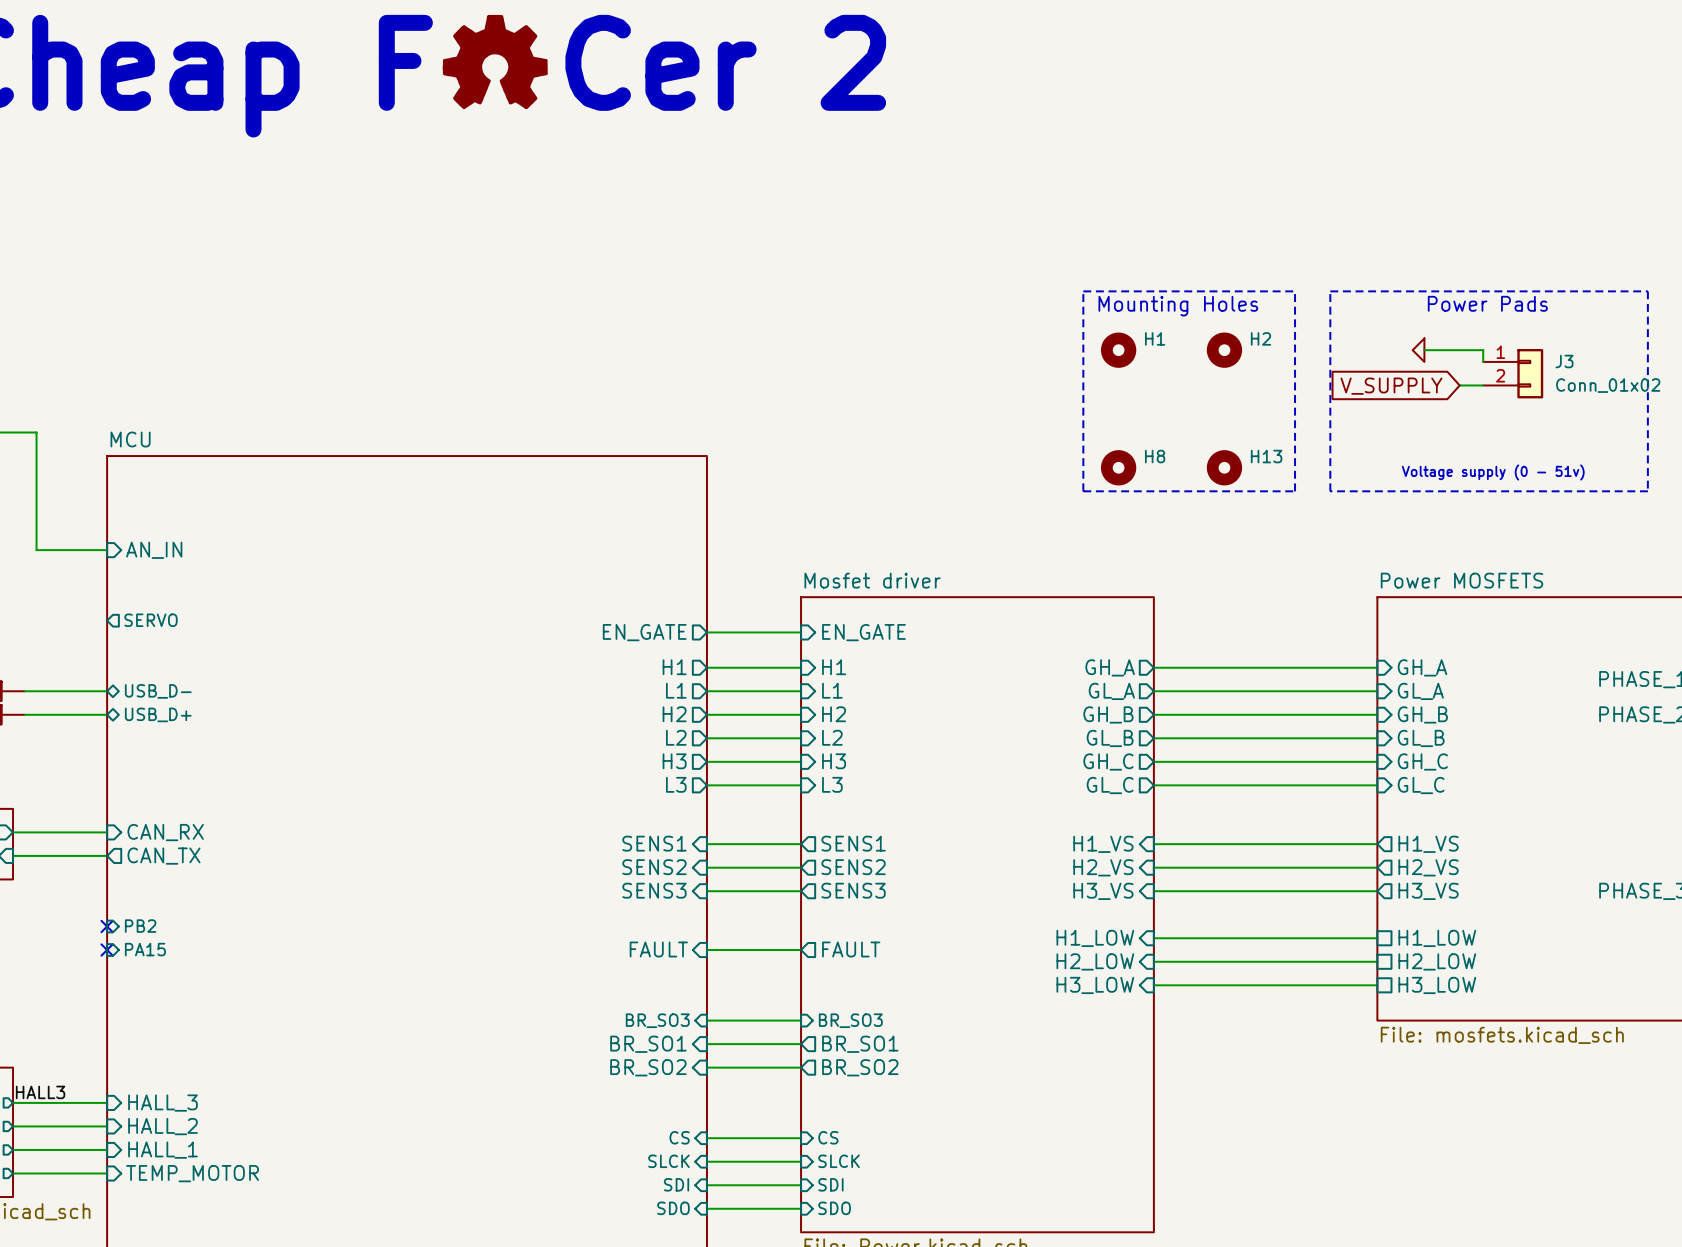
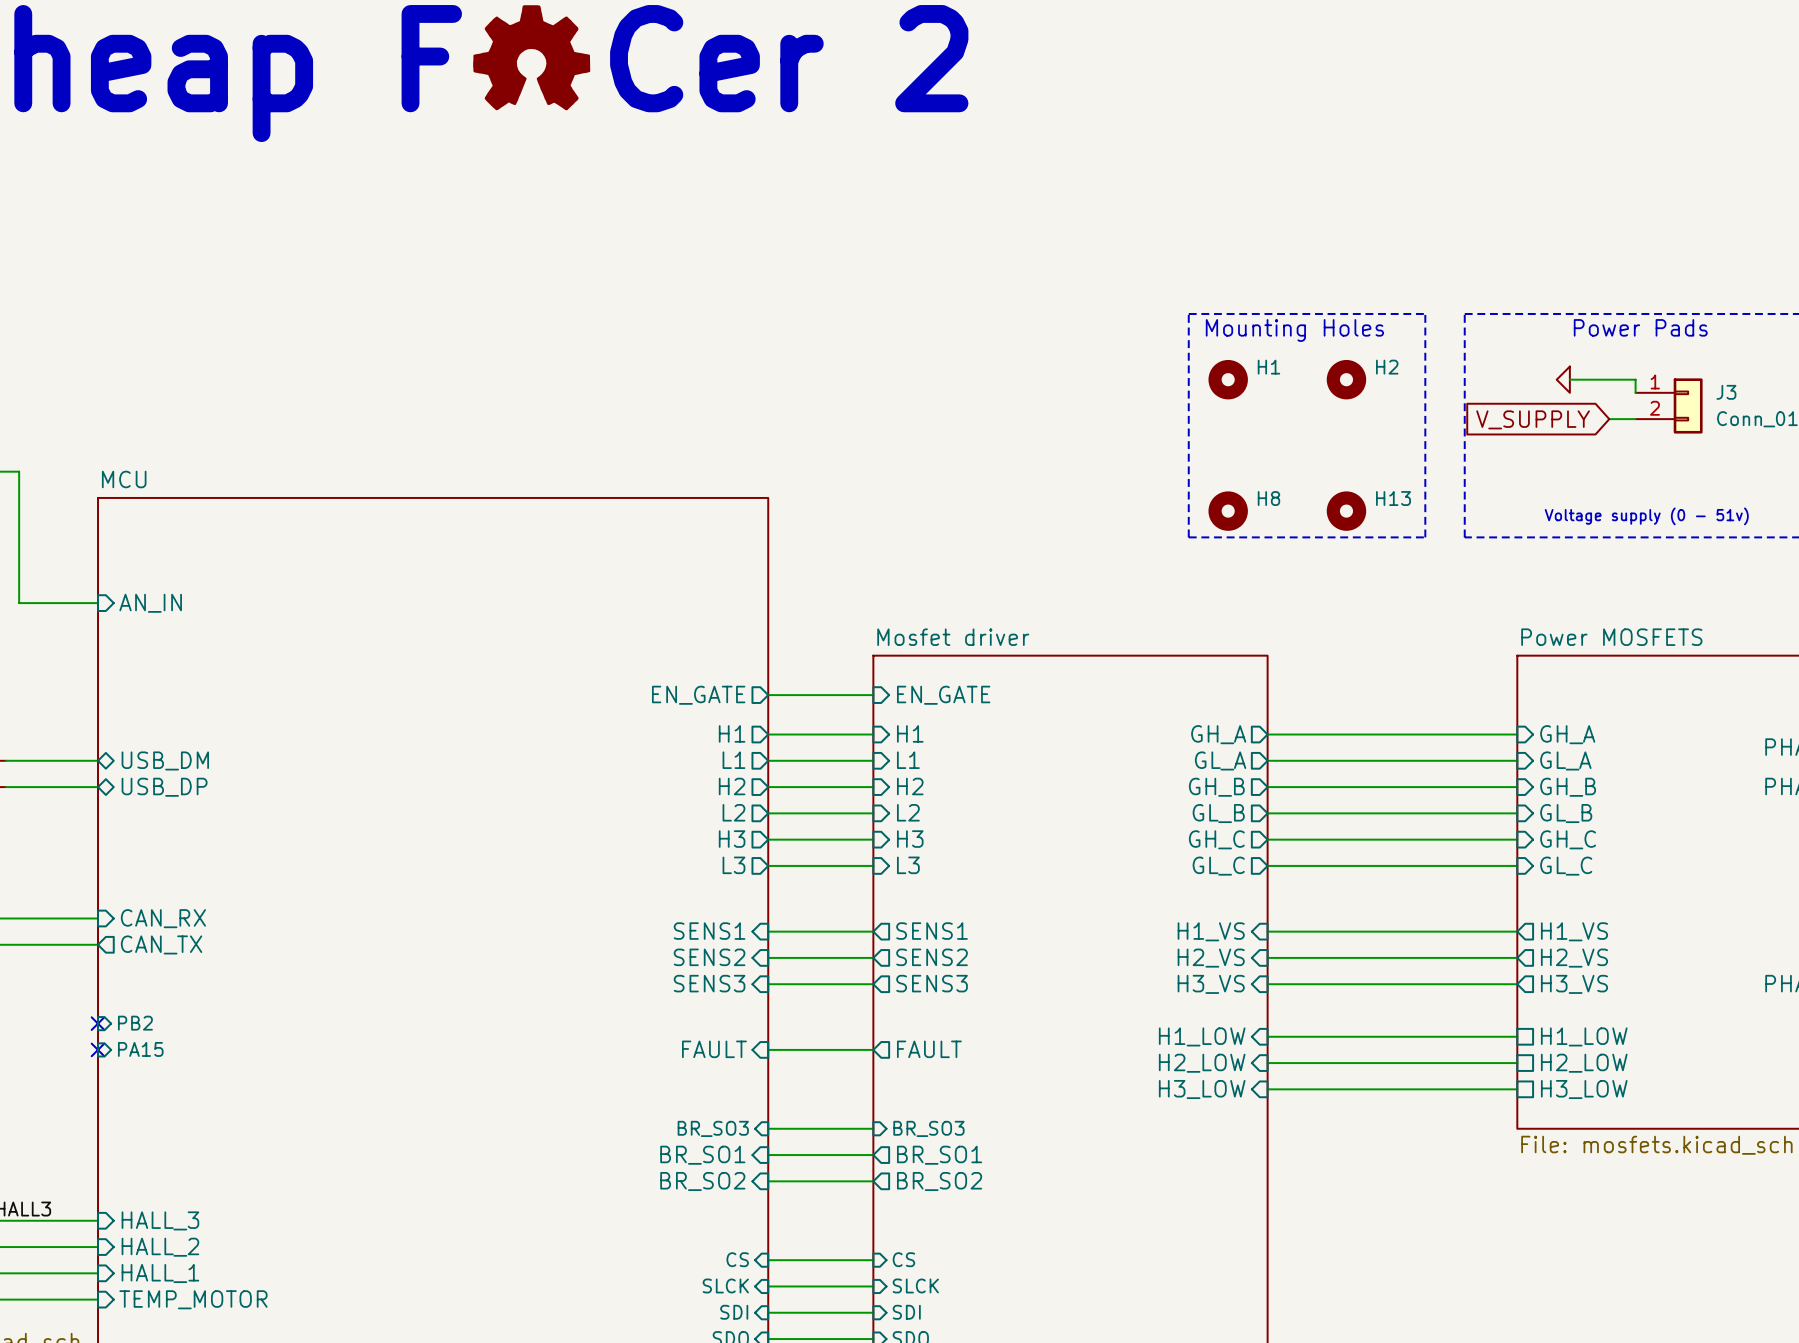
sheet pin: SERVO (150, 620) -> none
sheet pin: USB_D- (158, 691) -> USB_DM (165, 760)
sheet pin: USB_D+ (158, 714) -> USB_DP (164, 787)

